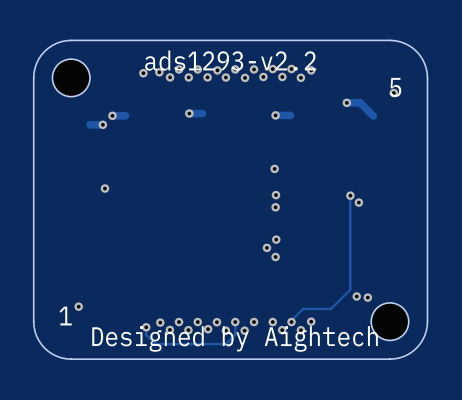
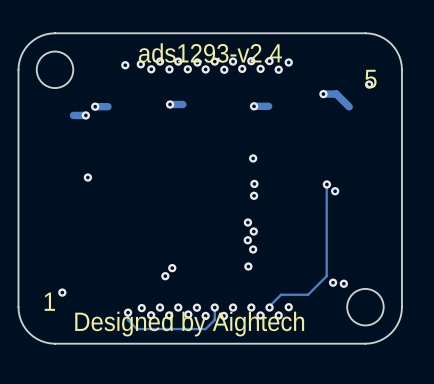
text: ads1293-v2.2 (230, 60) -> ads1293-v2.4 (210, 53)
via: none -> (247, 222)
via: (276, 239) -> none
via: none -> (253, 231)
via: (266, 247) -> none
via: none -> (247, 240)
via: (275, 256) -> none
via: none -> (253, 249)
via: none -> (248, 266)
via: none -> (172, 268)
via: none -> (165, 276)

